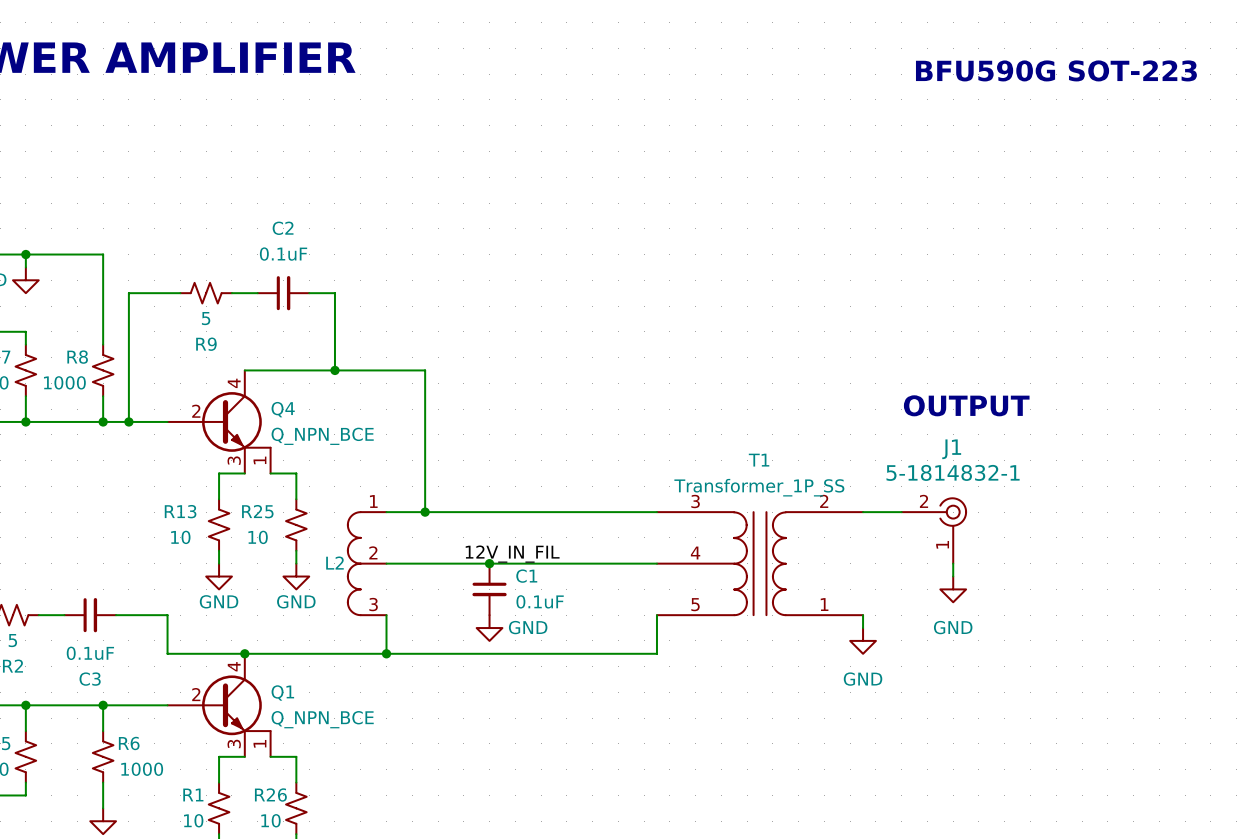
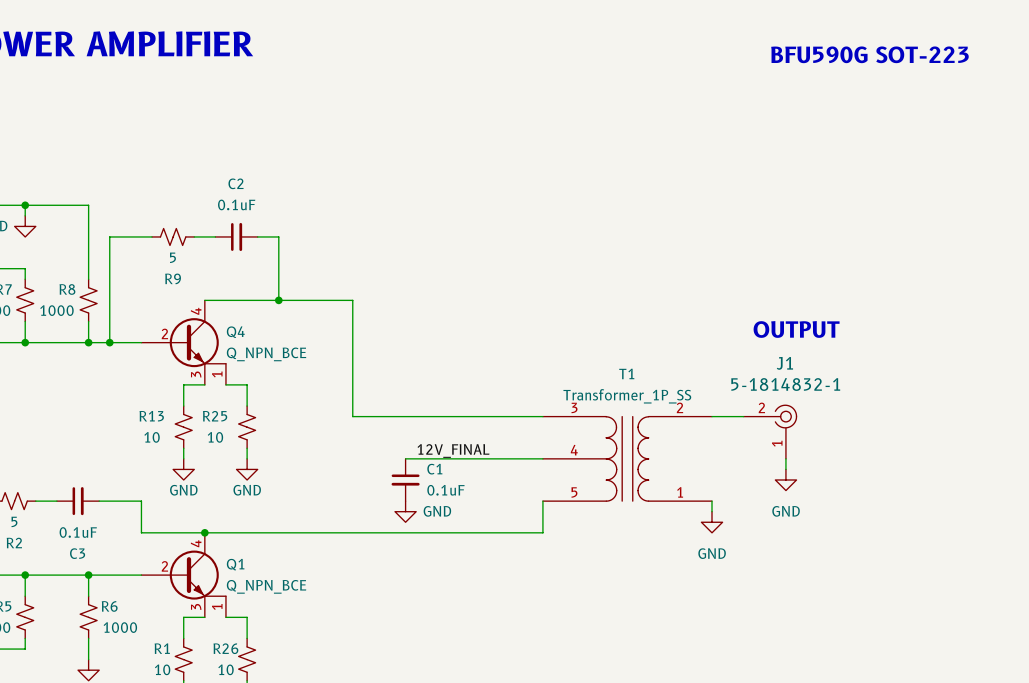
wire: (386, 512) (425, 512) -> none
junction: (425, 512) -> none
label: 12V_IN_FIL (512, 554) -> 12V_FINAL (453, 451)
L2: (367, 563) -> none
wire: (386, 563) (489, 563) -> none
junction: (489, 563) -> none
wire: (386, 615) (386, 653) -> none
junction: (386, 653) -> none

